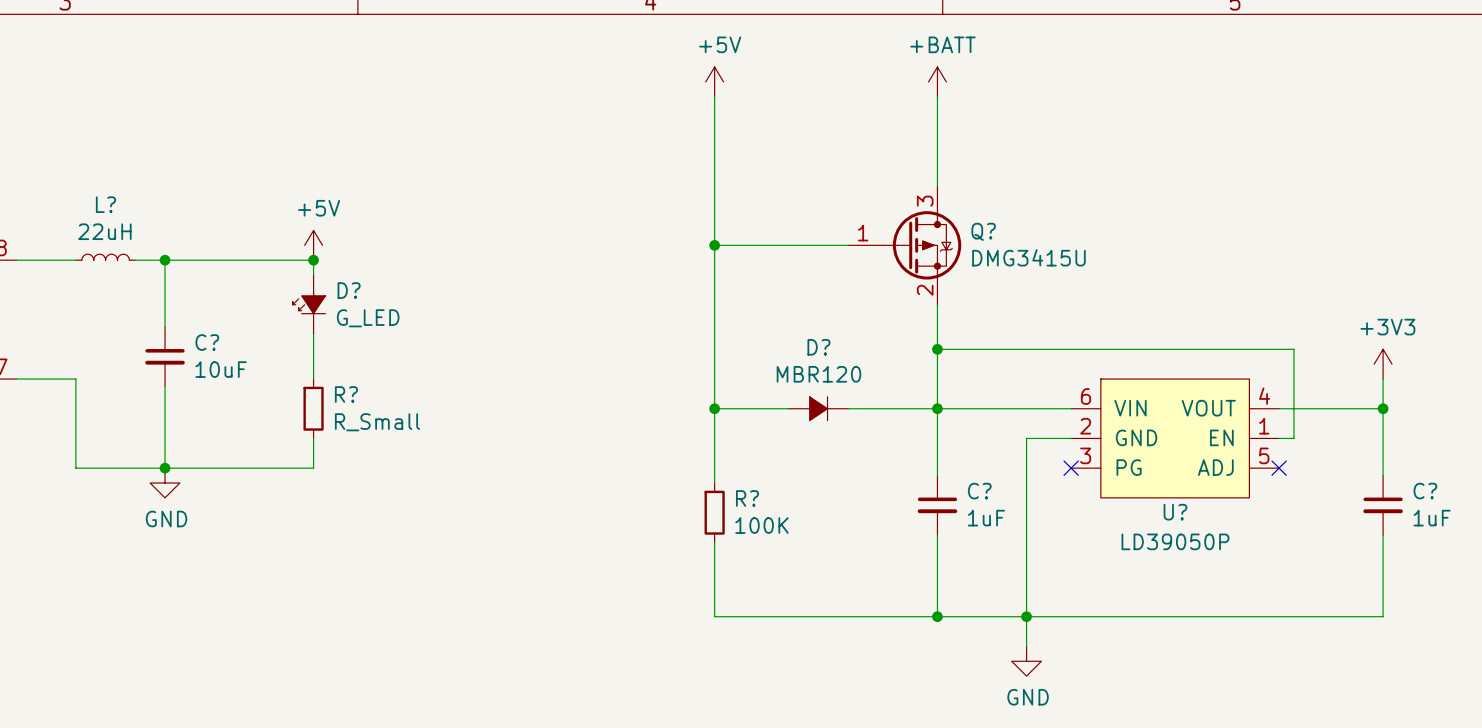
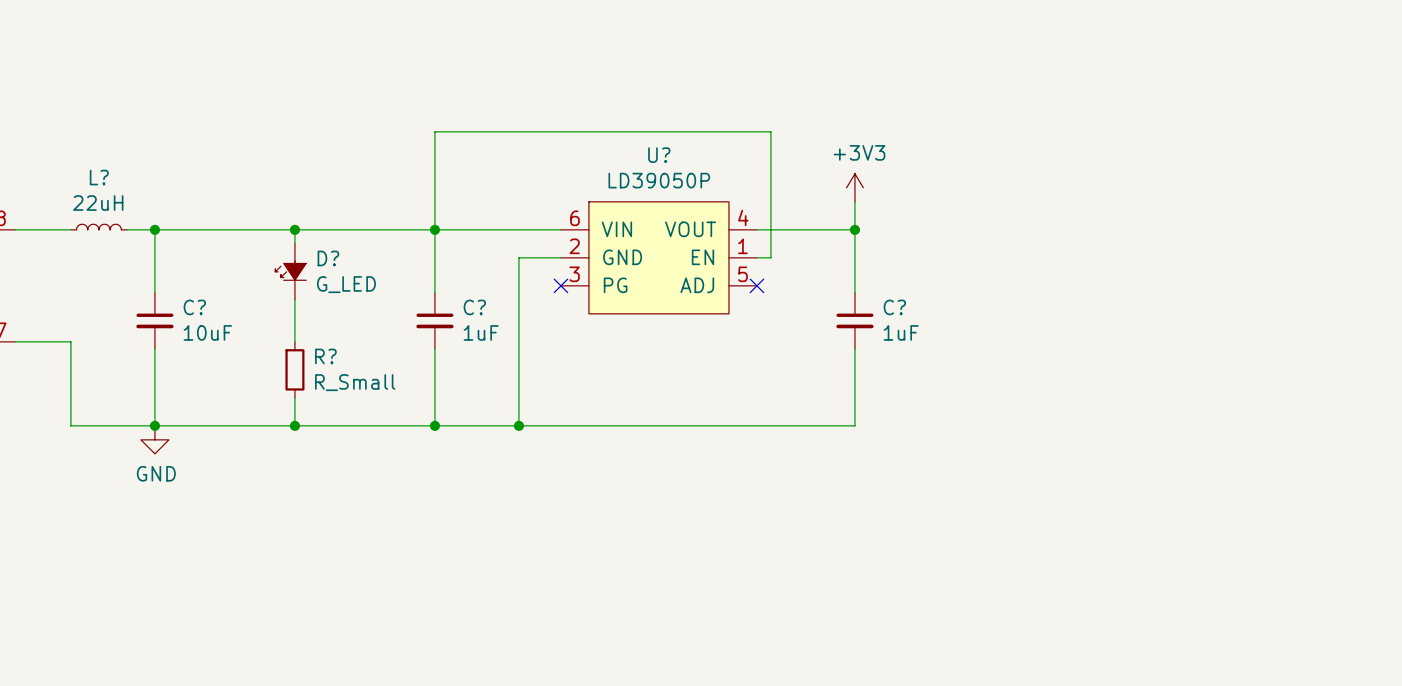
power symbol: +5V (714, 81) -> none
power symbol: +BATT (937, 81) -> none
wire: (714, 96) (714, 483) -> none
wire: (937, 96) (937, 185) -> none
power symbol: none -> +3V3 (854, 187)
wire: none -> (854, 201) (854, 292)
power symbol: +5V (313, 245) -> none
wire: (714, 245) (848, 245) -> none
junction: (714, 245) -> none
Q?: DMG3415U (904, 245) -> none
wire: none -> (294, 229) (560, 229)
junction: none -> (434, 229)
wire: none -> (756, 229) (854, 229)
junction: none -> (854, 229)
wire: none -> (560, 257) (518, 257) (518, 425)
U?: none -> LD39050P (658, 257)
wire: none -> (756, 257) (770, 257) (770, 131) (434, 131) (434, 292)
wire: (937, 304) (937, 475) -> none
no-connect mark: none -> (560, 285)
no-connect mark: none -> (756, 285)
wire: (937, 349) (1293, 349) (1293, 438) (1279, 438) -> none
junction: (937, 349) -> none
C?: none -> 1uF (434, 320)
power symbol: +3V3 (1383, 364) -> none
wire: (1383, 379) (1383, 475) -> none
wire: none -> (434, 348) (434, 425)
wire: none -> (854, 348) (854, 425) (294, 425)
wire: (714, 408) (788, 408) -> none
junction: (714, 408) -> none
D?: MBR120 (818, 408) -> none
wire: (848, 408) (1071, 408) -> none
junction: (937, 408) -> none
wire: (1279, 408) (1383, 408) -> none
junction: (1383, 408) -> none
wire: (1071, 438) (1026, 438) (1026, 646) -> none
U?: LD39050P (1175, 438) -> none
junction: none -> (294, 425)
junction: none -> (434, 425)
junction: none -> (518, 425)
no-connect mark: (1071, 468) -> none
no-connect mark: (1279, 468) -> none
C? position: (937, 505) -> (854, 320)
C?: 1uF (1383, 505) -> none
R?: 100K (714, 512) -> none
wire: (937, 535) (937, 616) -> none
wire: (1383, 535) (1383, 616) (714, 616) (714, 542) -> none
junction: (937, 616) -> none
junction: (1026, 616) -> none
power symbol: GND (1026, 661) -> none

